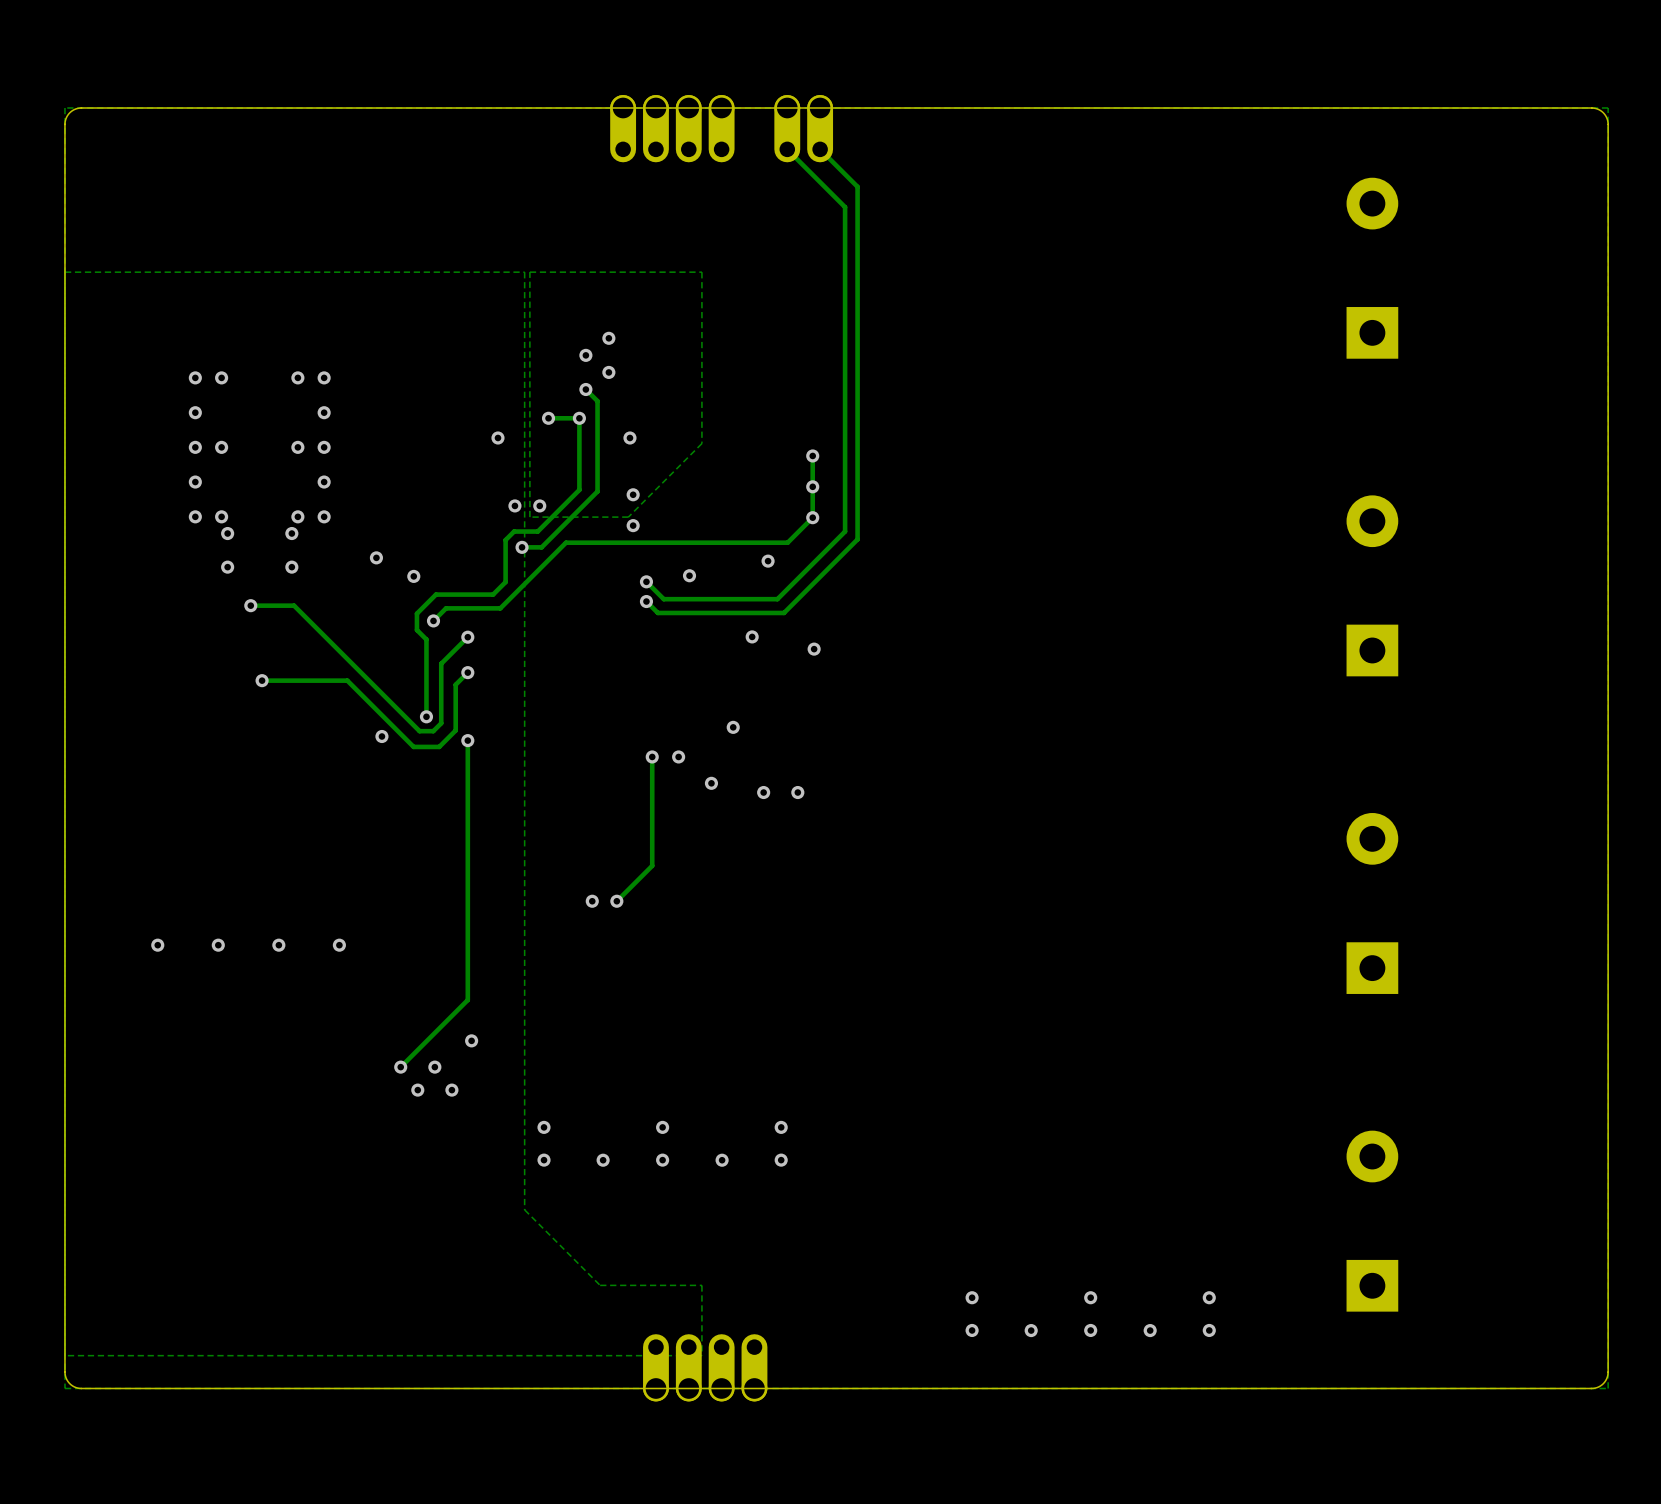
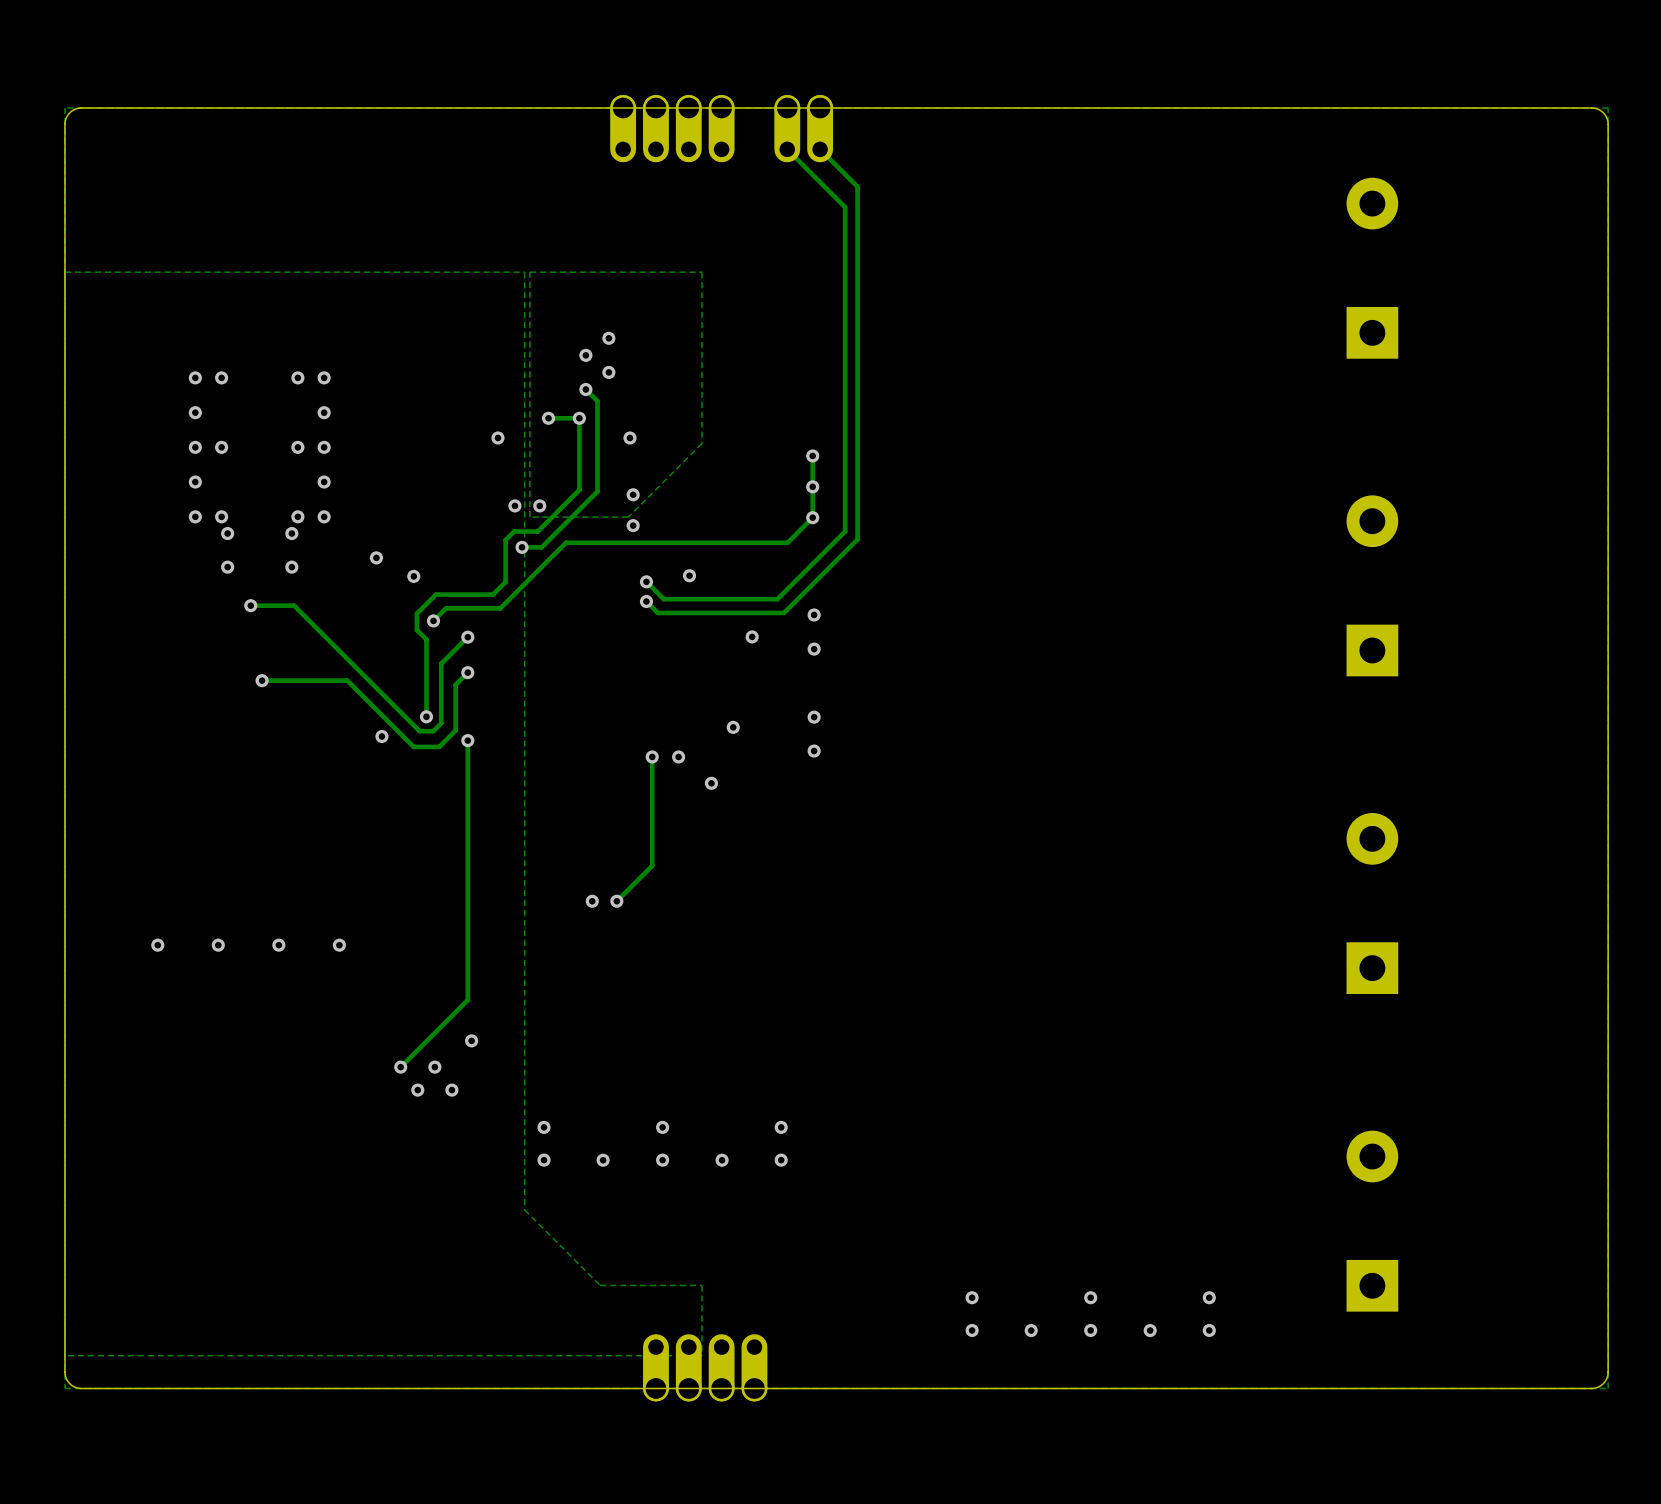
via position: (768, 561) -> (814, 614)
via: none -> (814, 717)
via: none -> (814, 751)
via: (763, 792) -> none
via: (797, 792) -> none

